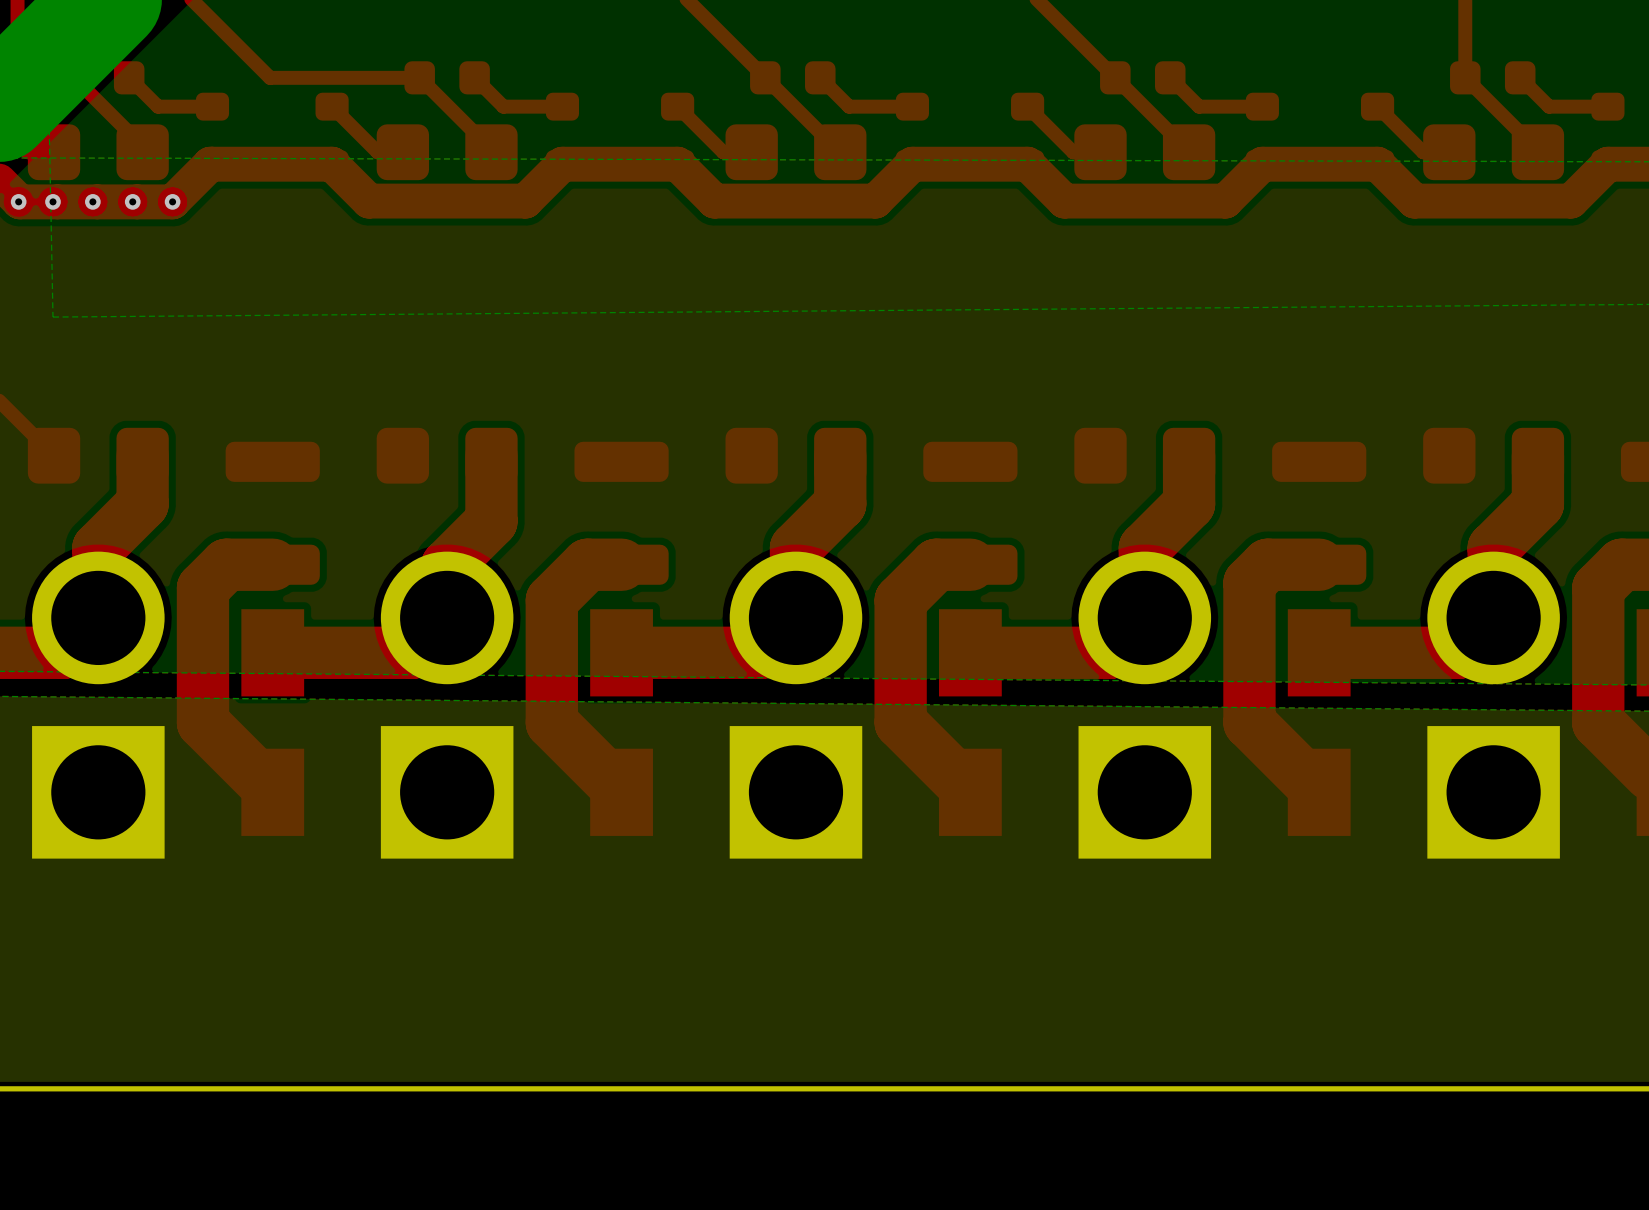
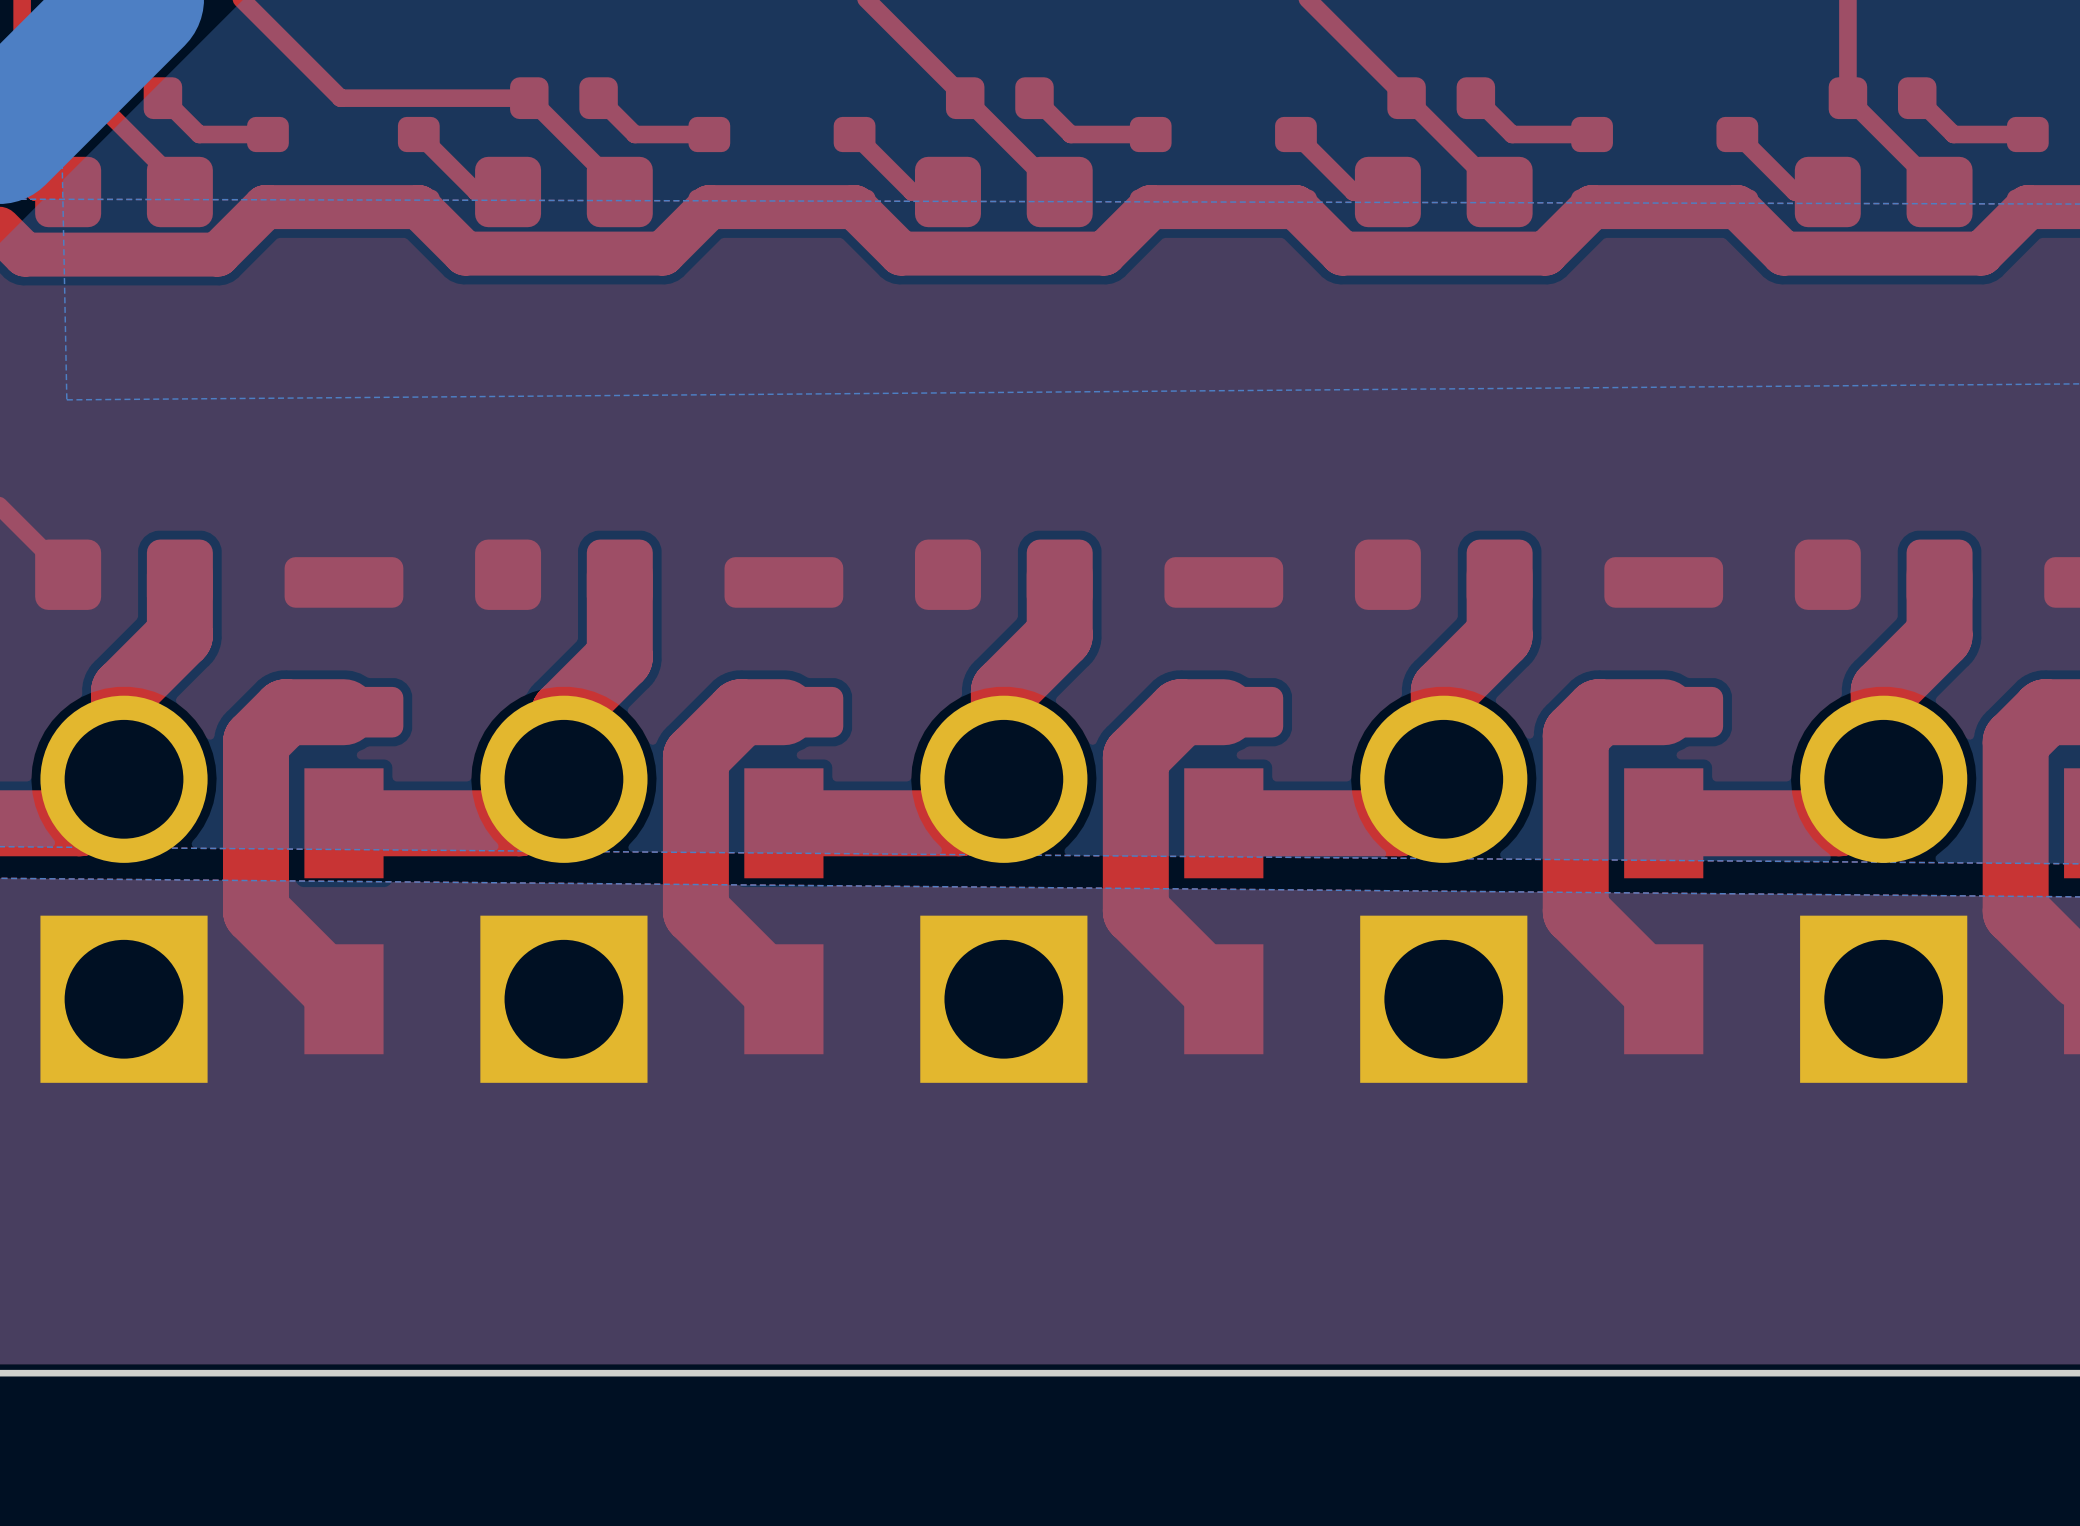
via: (18, 201) -> none
via: (52, 201) -> none
via: (92, 201) -> none
via: (132, 201) -> none
via: (172, 201) -> none

